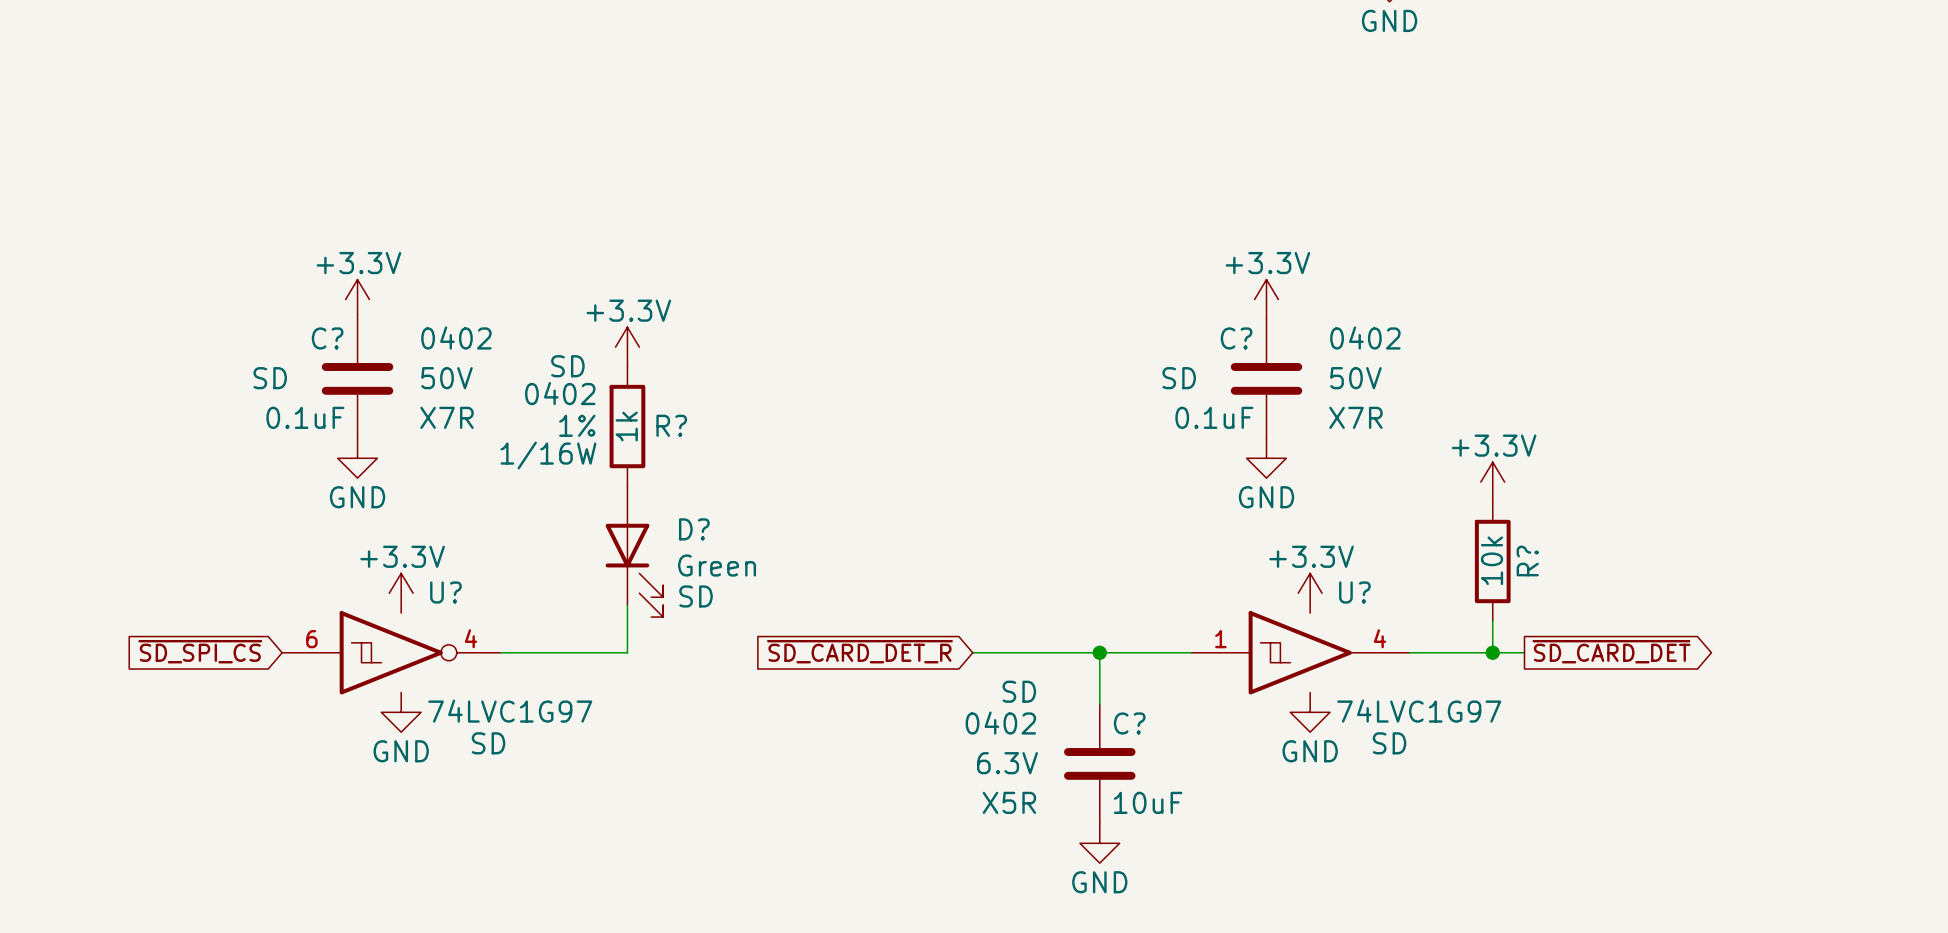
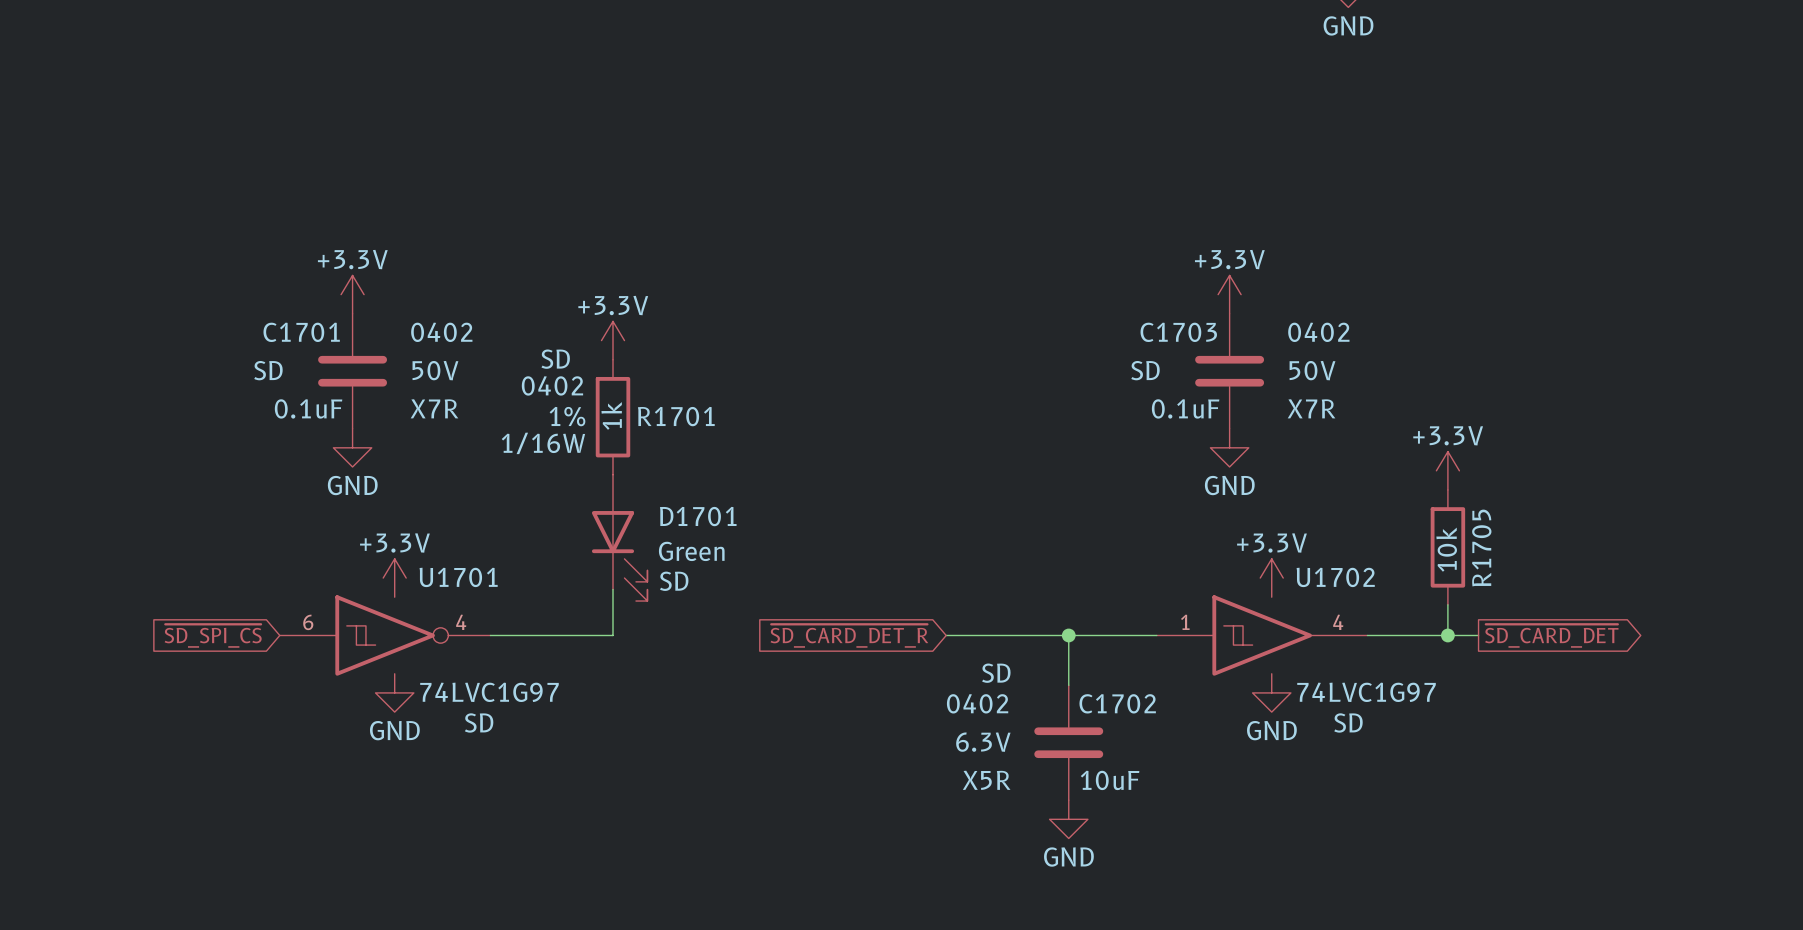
C? name: C? (327, 338) -> C1701 (301, 332)
C? name: C? (1236, 338) -> C1703 (1178, 332)
R? name: R? (671, 425) -> R1701 (676, 416)
D? name: D? (694, 529) -> D1701 (698, 516)
R? name: R? (1527, 561) -> R1705 (1481, 548)
U? name: U? (445, 592) -> U1701 (458, 577)
U? name: U? (1354, 592) -> U1702 (1335, 577)
C? name: C? (1129, 723) -> C1702 (1117, 703)

